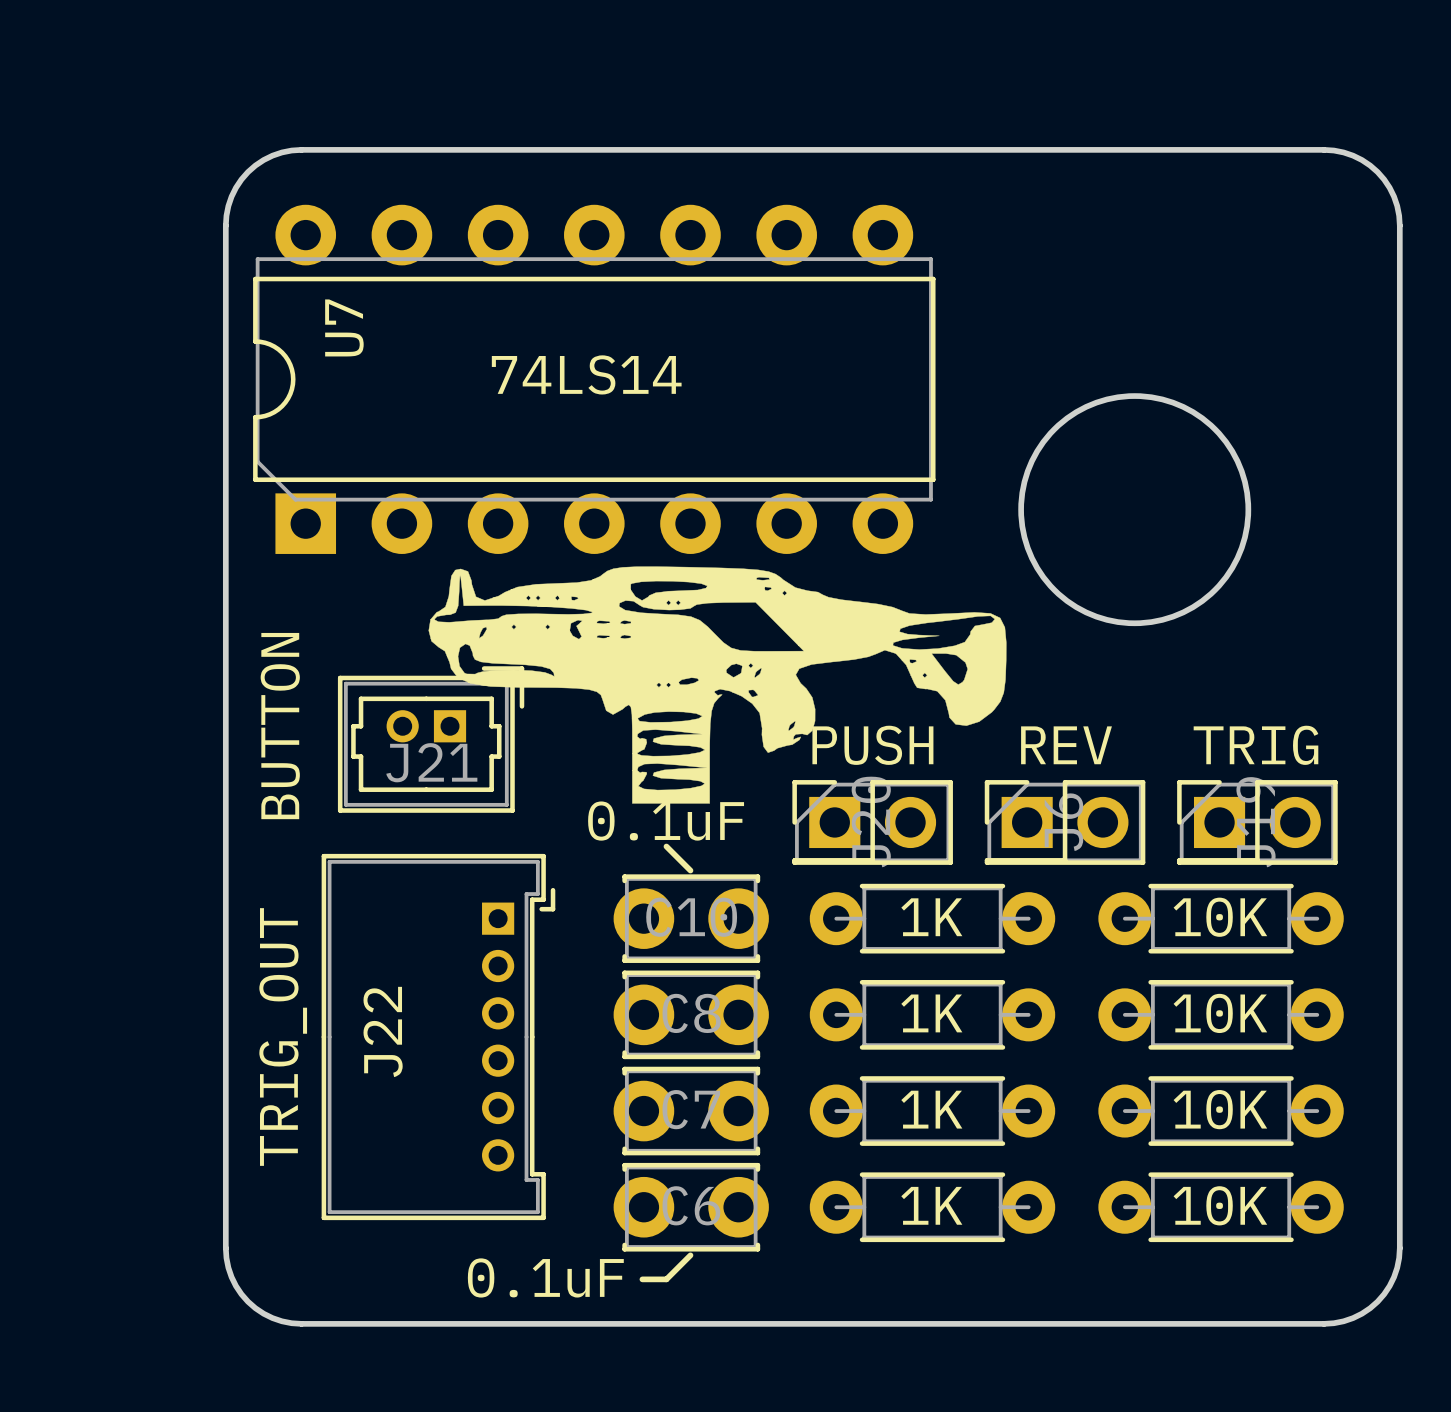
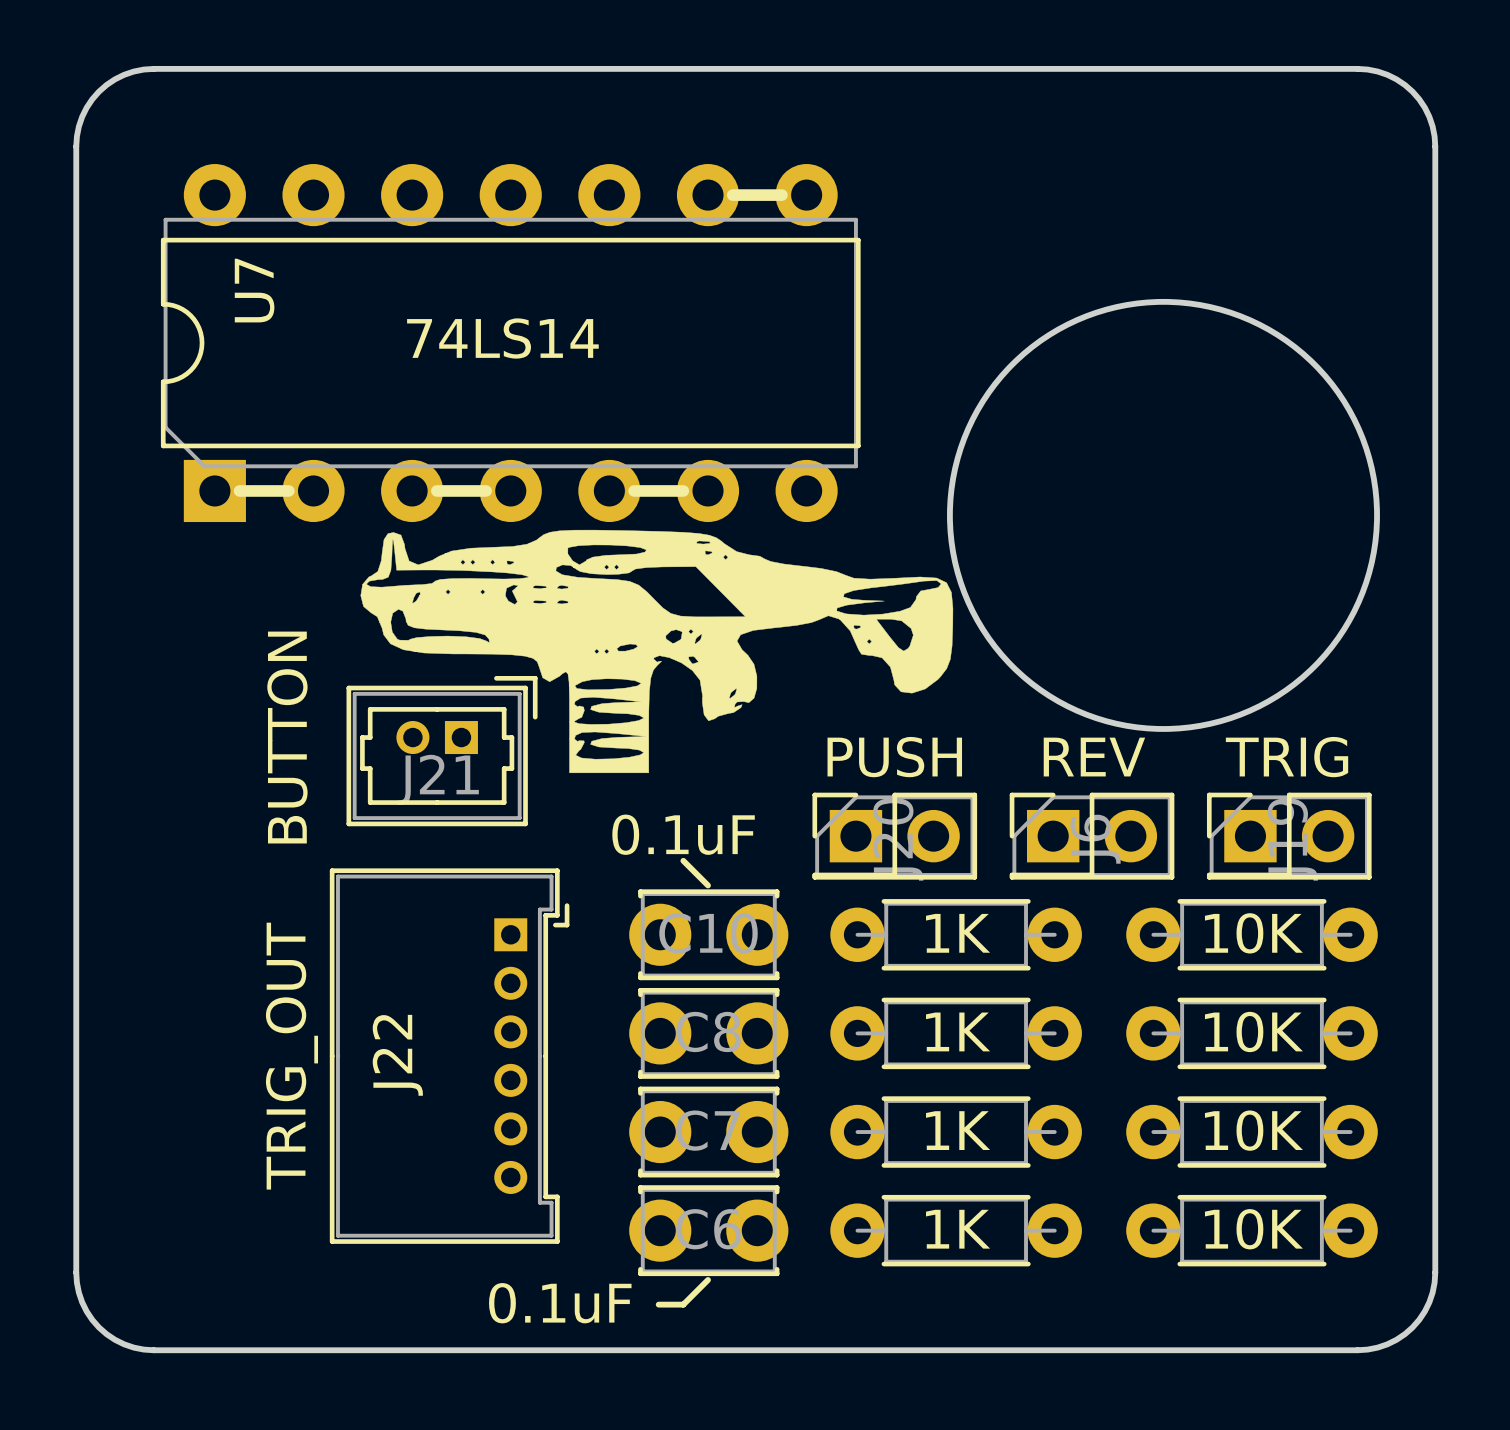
line: none -> (732, 195) (781, 195)
board edge: (1399, 225) (1394, 196) (1377, 172) (1353, 155) (1324, 149) (301, 149) (272, 155) (248, 172) (231, 196) (225, 225) (225, 1248) (231, 1277) (248, 1301) (272, 1318) (301, 1323) -> (1435, 224) (1435, 146) (1429, 116) (1419, 99) (1404, 84) (1387, 74) (1367, 69) (153, 68) (124, 74) (99, 91) (82, 116) (76, 146) (76, 1282) (82, 1302) (99, 1327) (115, 1339) (133, 1347) (153, 1350) (309, 1350)
U7 position: (594, 379) -> (510, 343)
round board edge size: [1018, 393, 1252, 627] -> [947, 298, 1380, 732]
line: none -> (239, 490) (288, 490)
line: none -> (436, 490) (486, 490)
line: none -> (634, 490) (683, 490)
drawing position: (717, 685) -> (656, 651)

